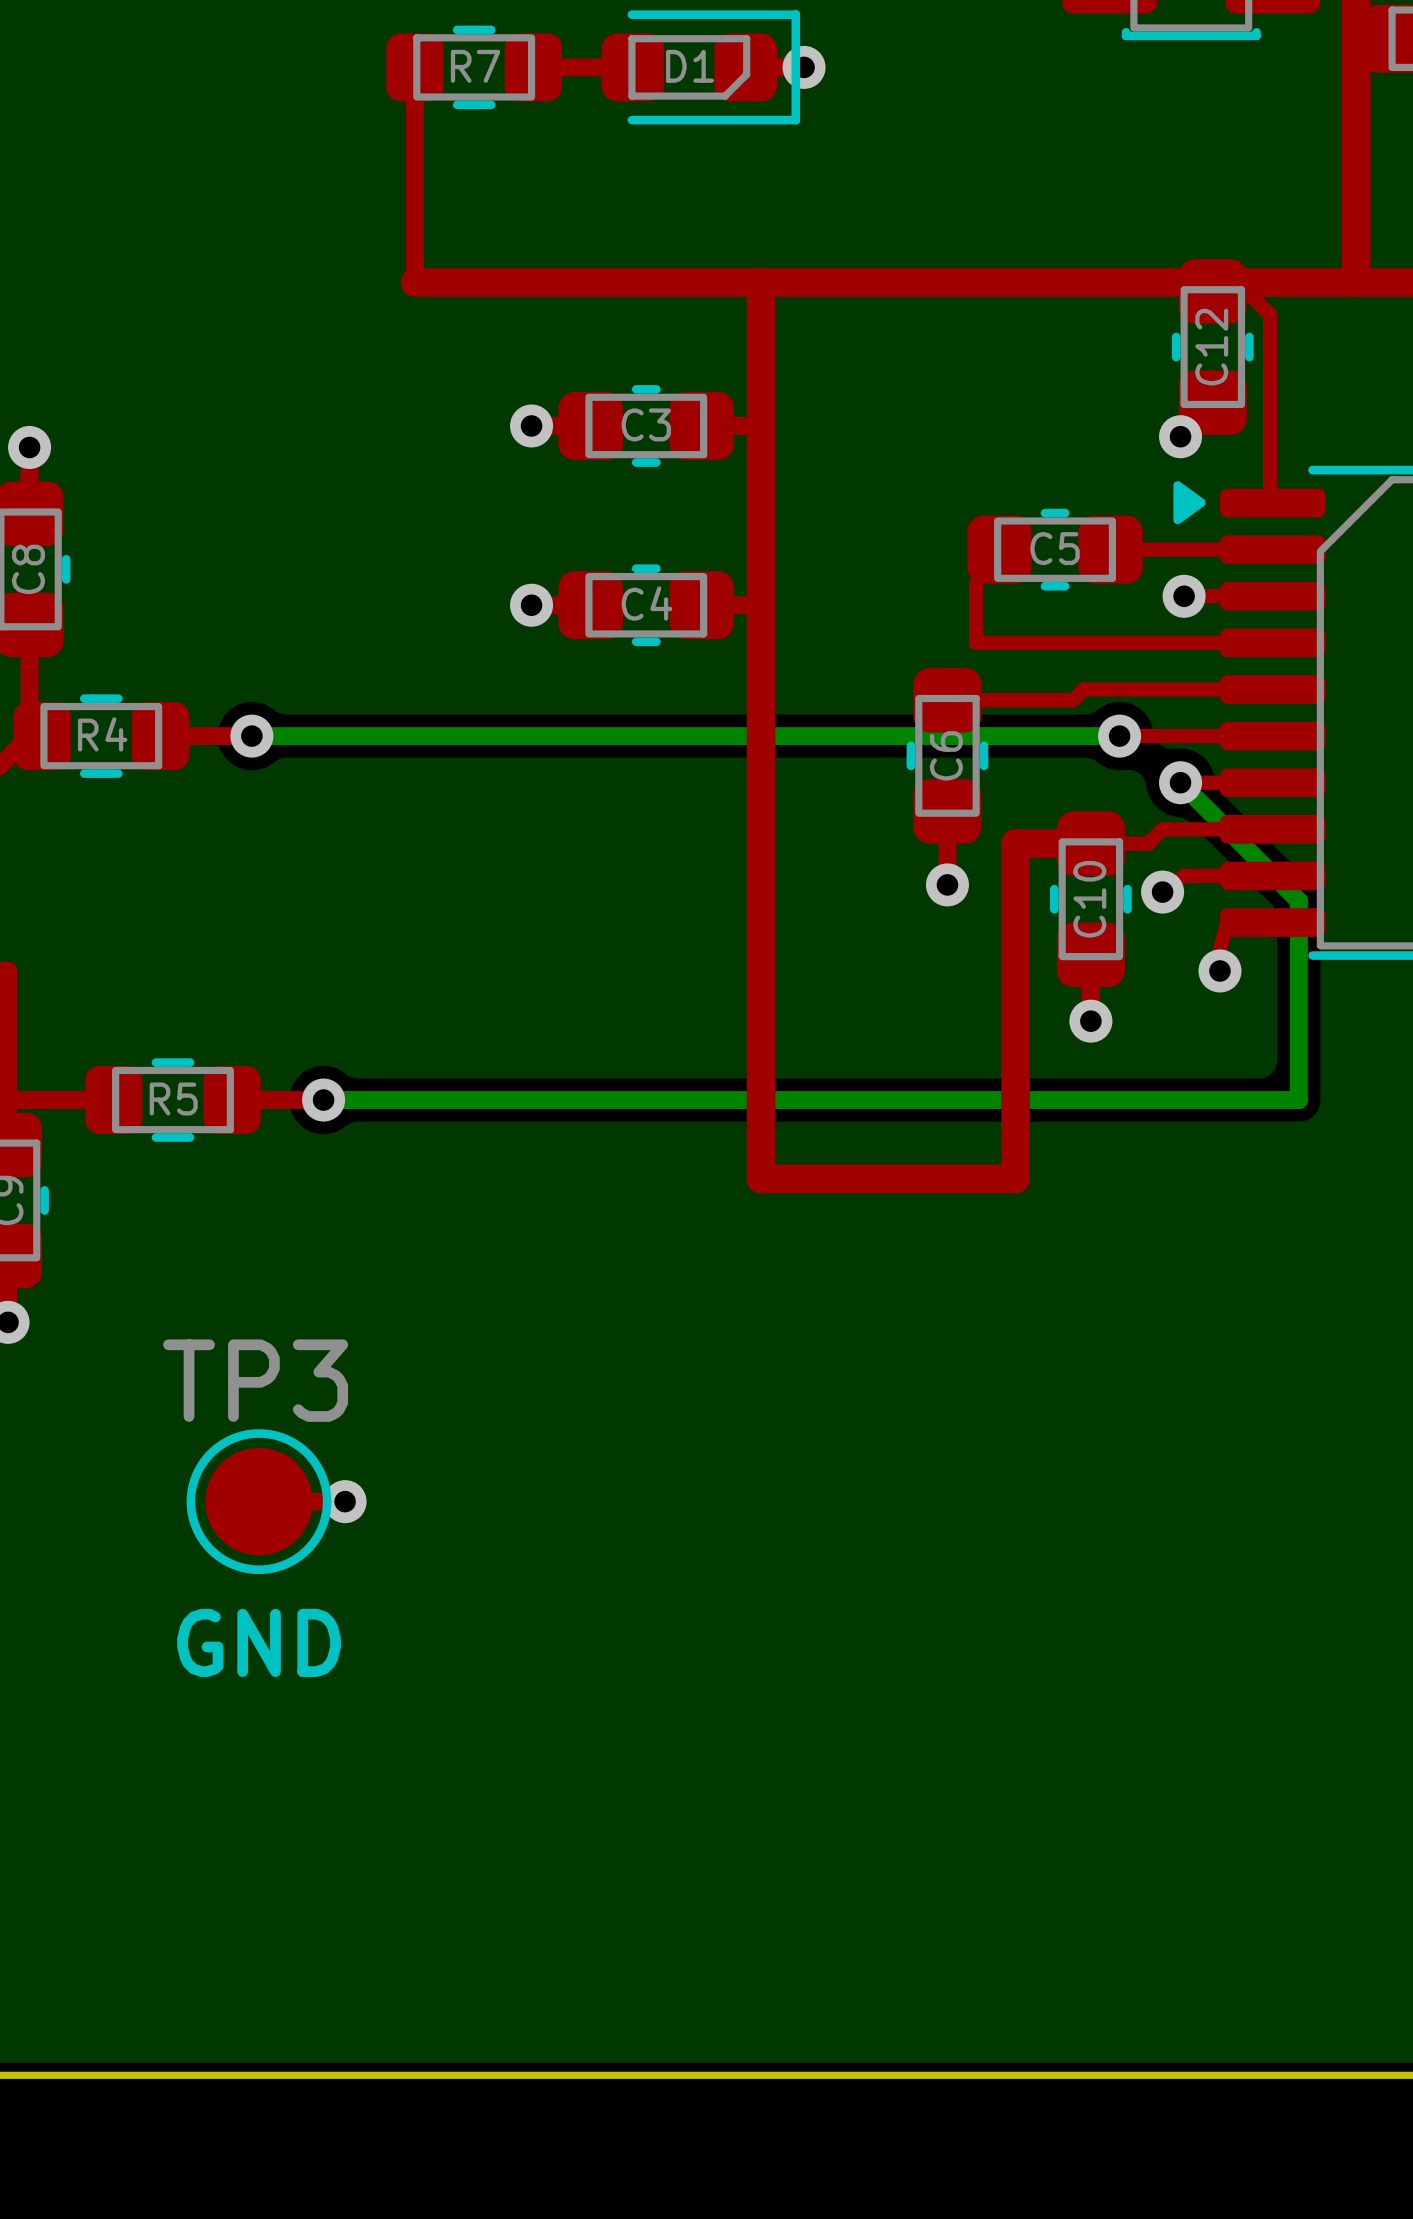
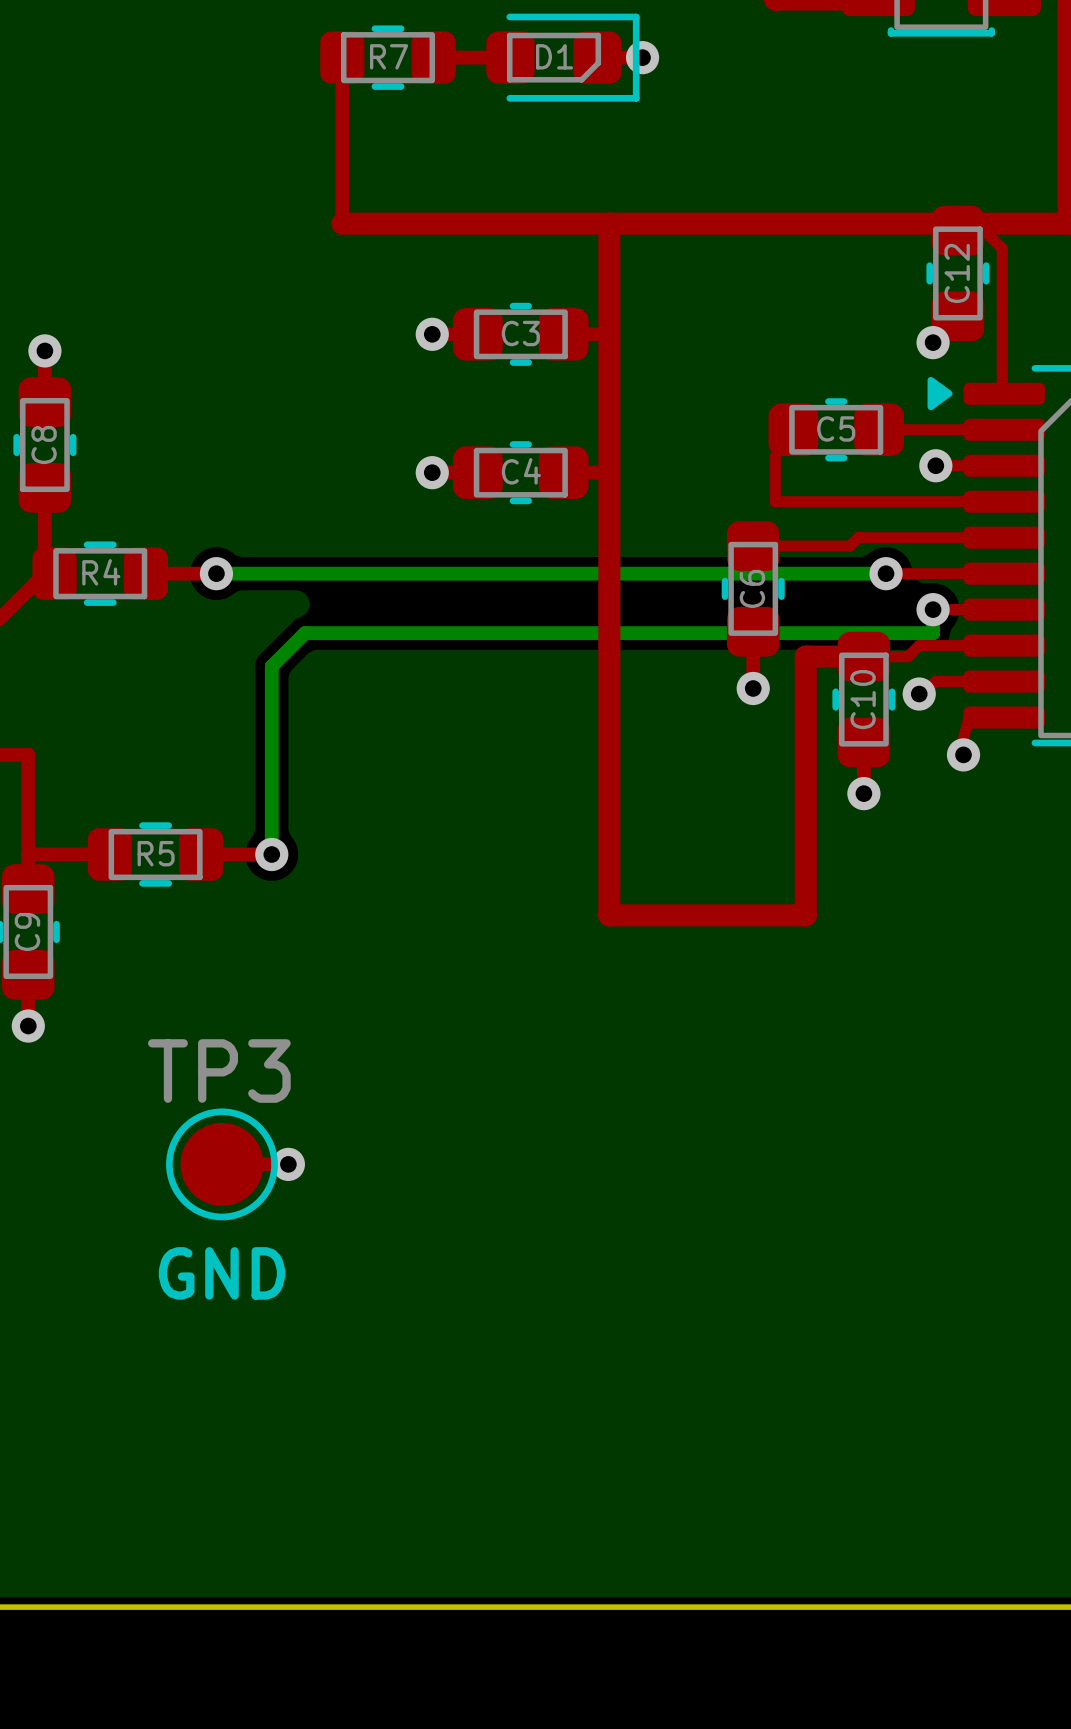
bottom track: (1180, 782) (1298, 901) (1298, 1100) (323, 1100) -> (933, 609) (933, 633) (304, 633) (271, 666) (271, 854)

